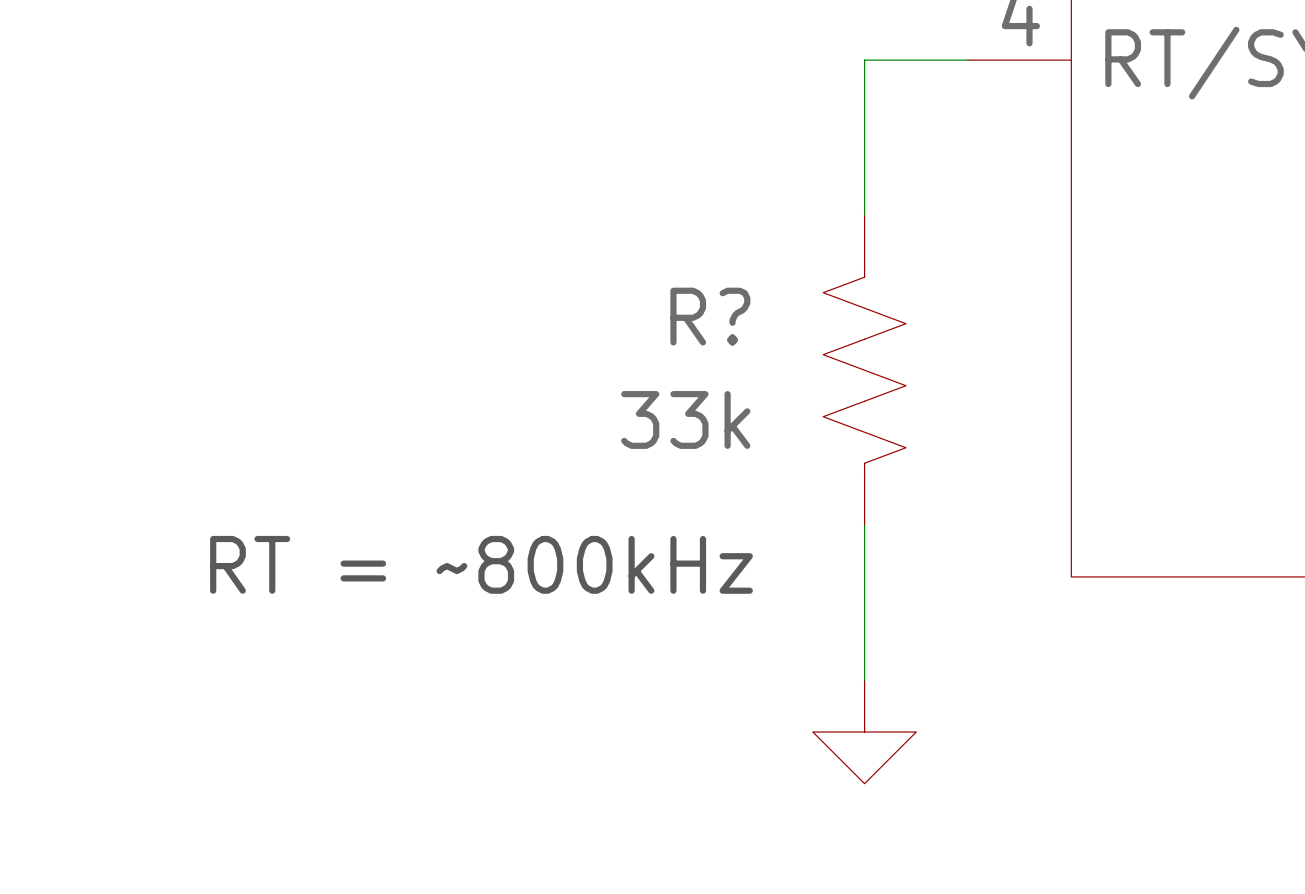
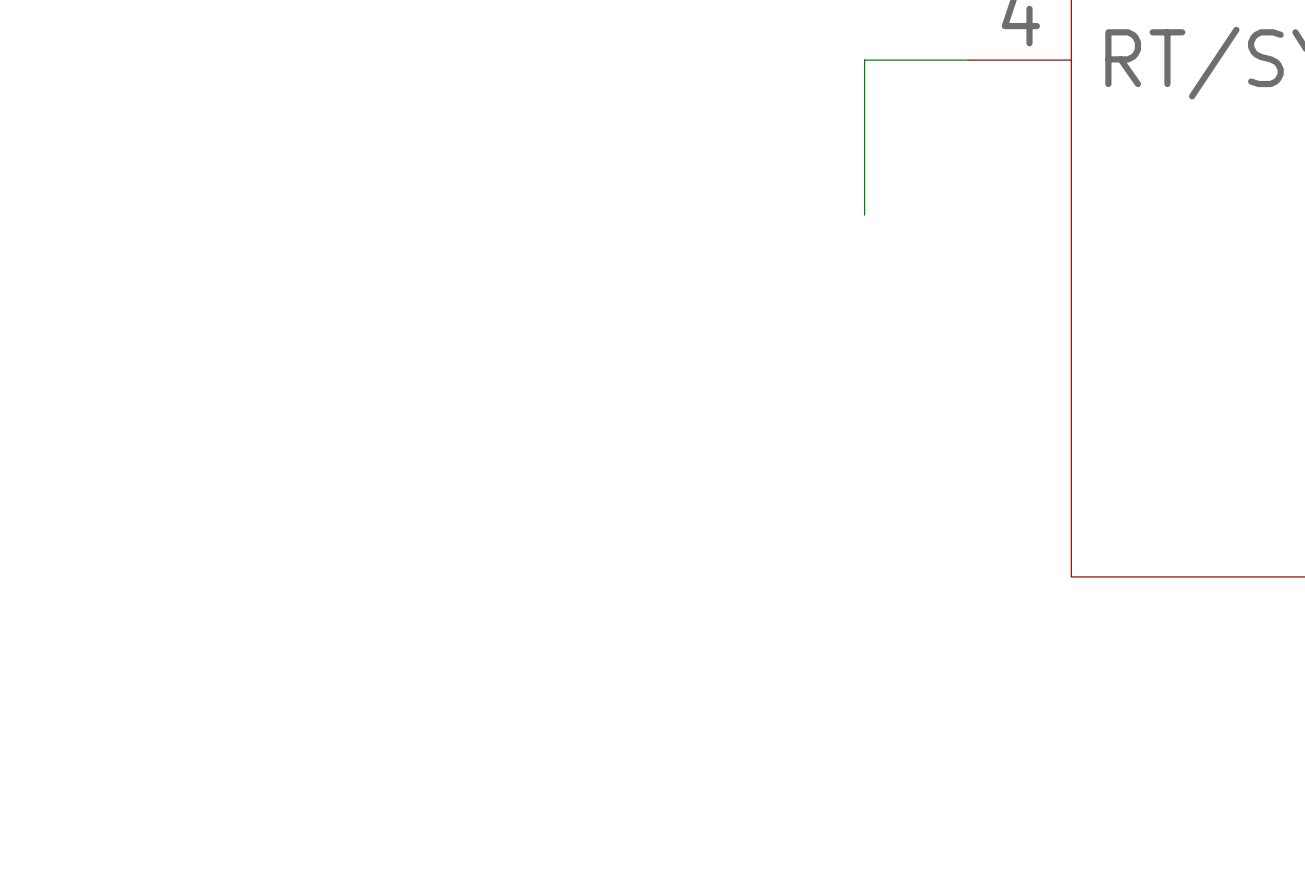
R?: 33k (864, 370) -> none
wire: (864, 525) (864, 680) -> none
text: RT = ~800kHz (481, 564) -> none
power symbol: (864, 732) -> none

